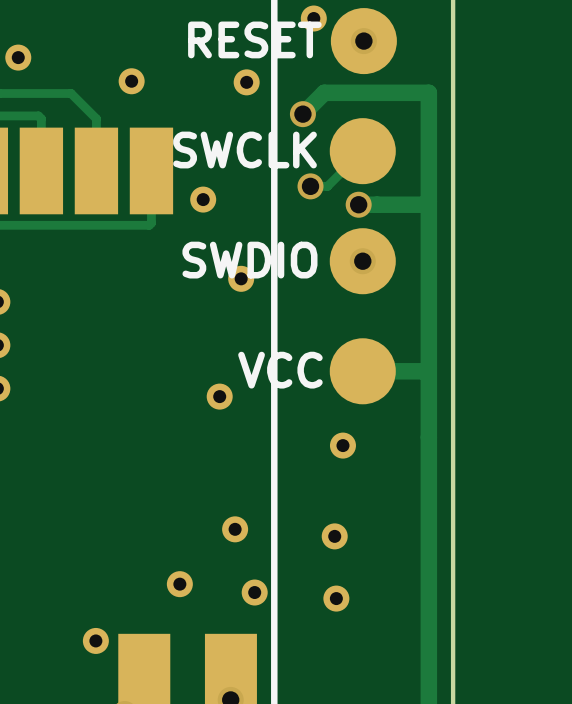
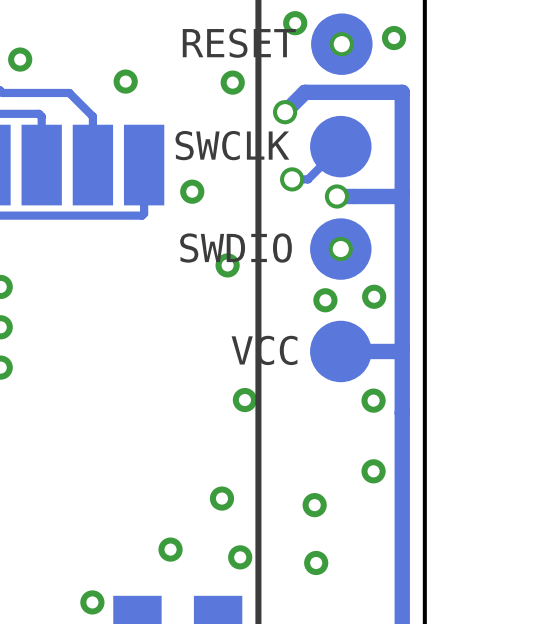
part: none -> (394, 38)
part: none -> (374, 296)
part: none -> (325, 300)
part: (219, 396) -> none
part: none -> (244, 400)
part: none -> (373, 400)
part: (342, 445) -> none
part: none -> (373, 471)

